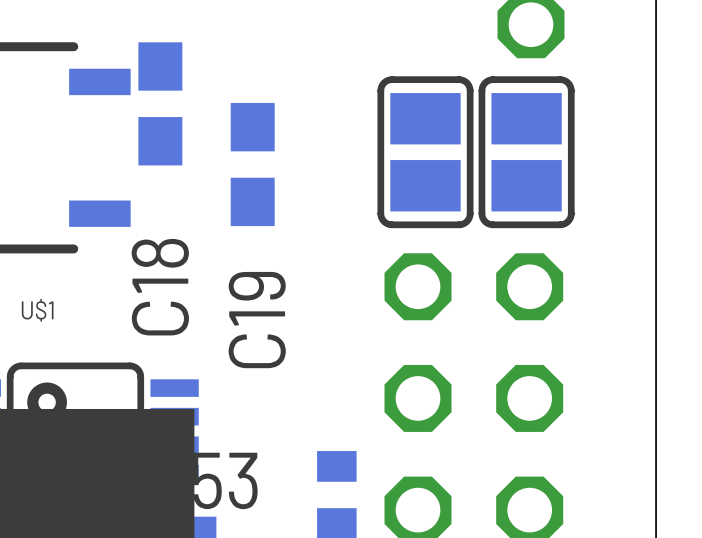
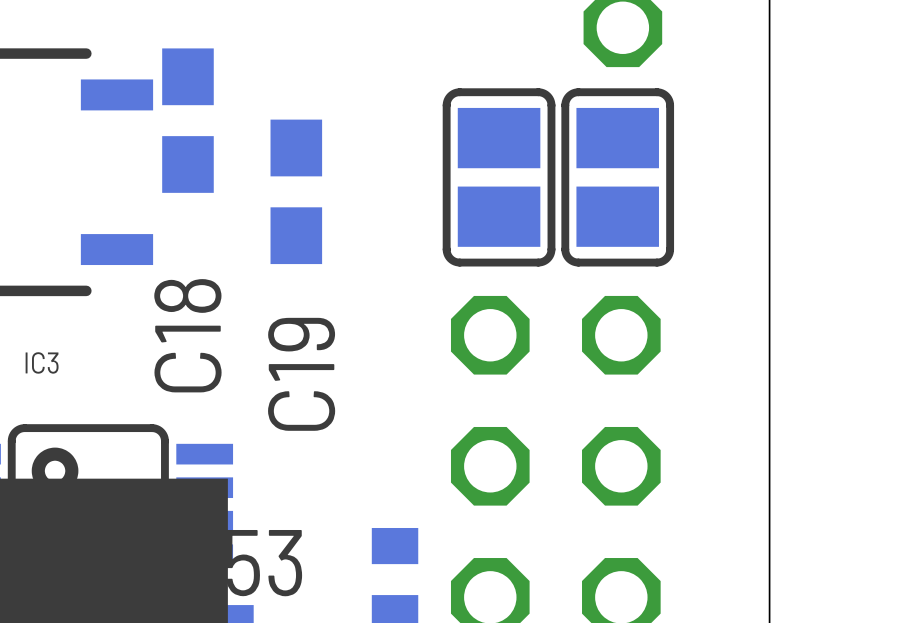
U$1 name: U$1 (37, 310) -> IC3 (42, 362)

